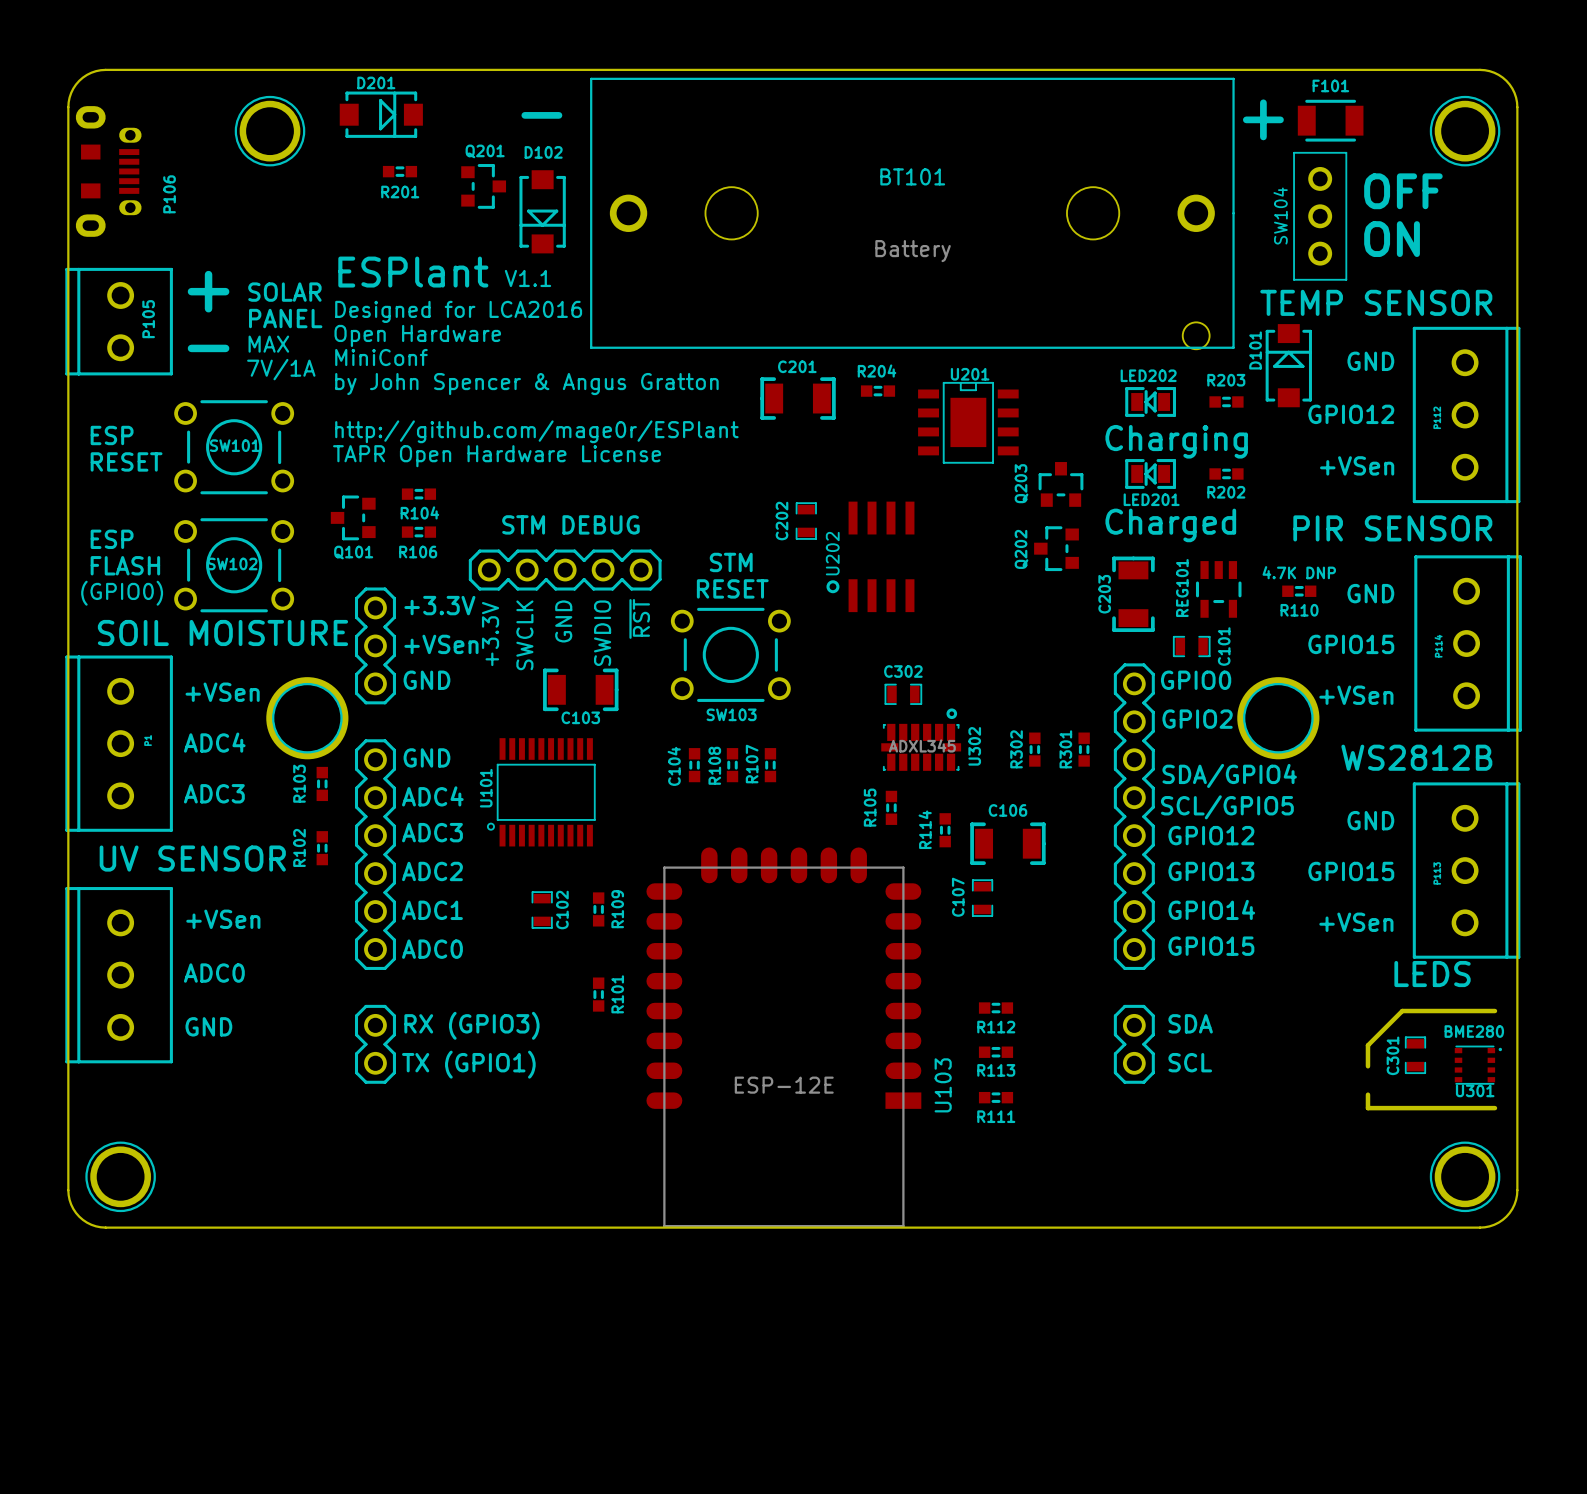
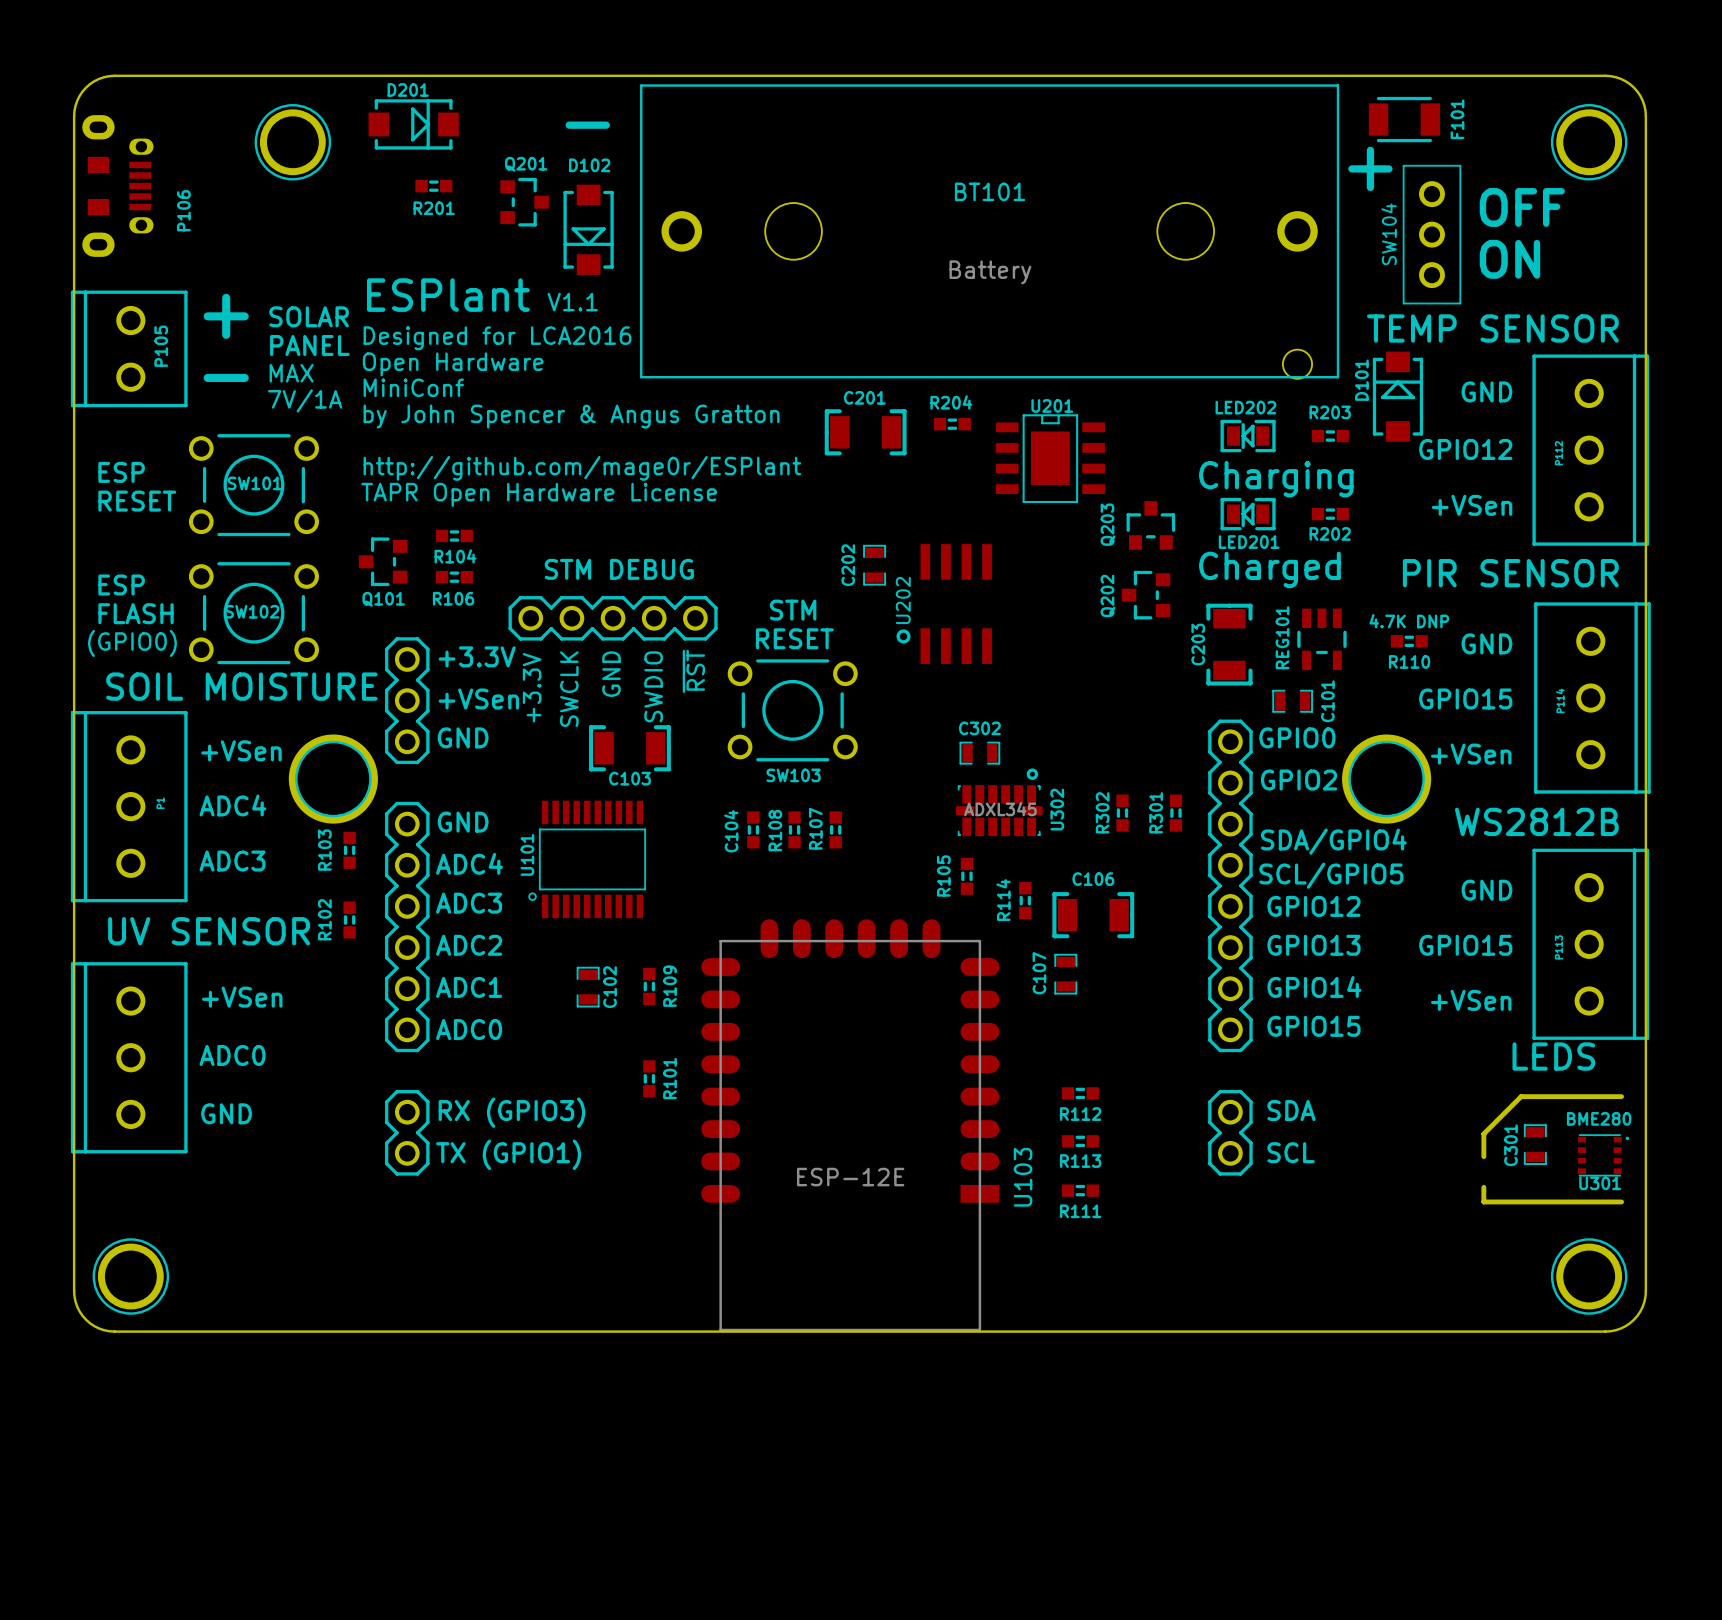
F101 name rotation: 0° (1330, 85) -> 90° counterclockwise (1457, 119)
BT101 text position: + (1263, 119) -> + (1370, 168)
F101 position: (1330, 120) -> (1404, 119)

